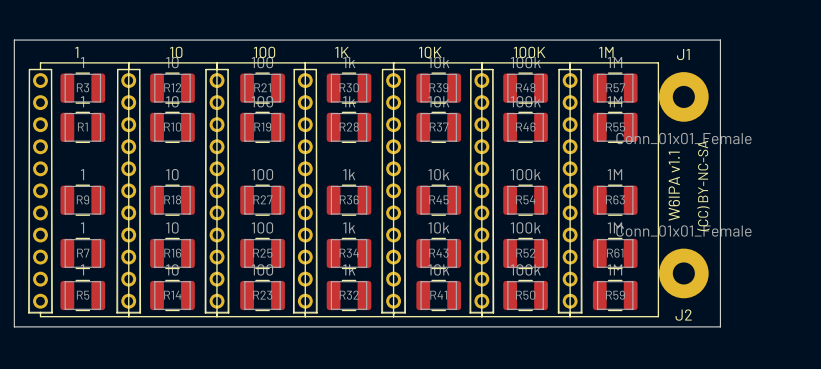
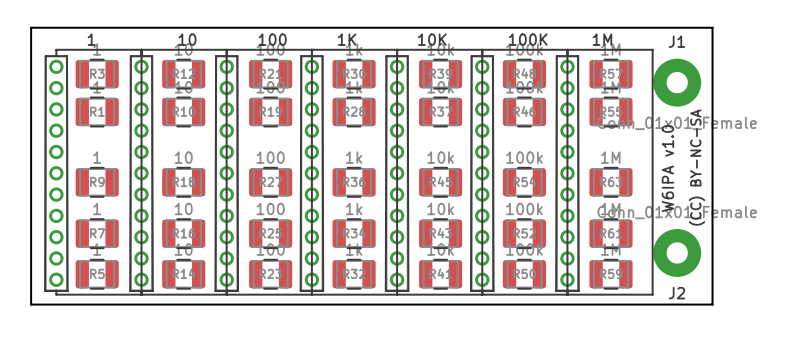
text: W6IPA v1.1 (674, 186) -> W6IPA v1.0 (667, 168)

